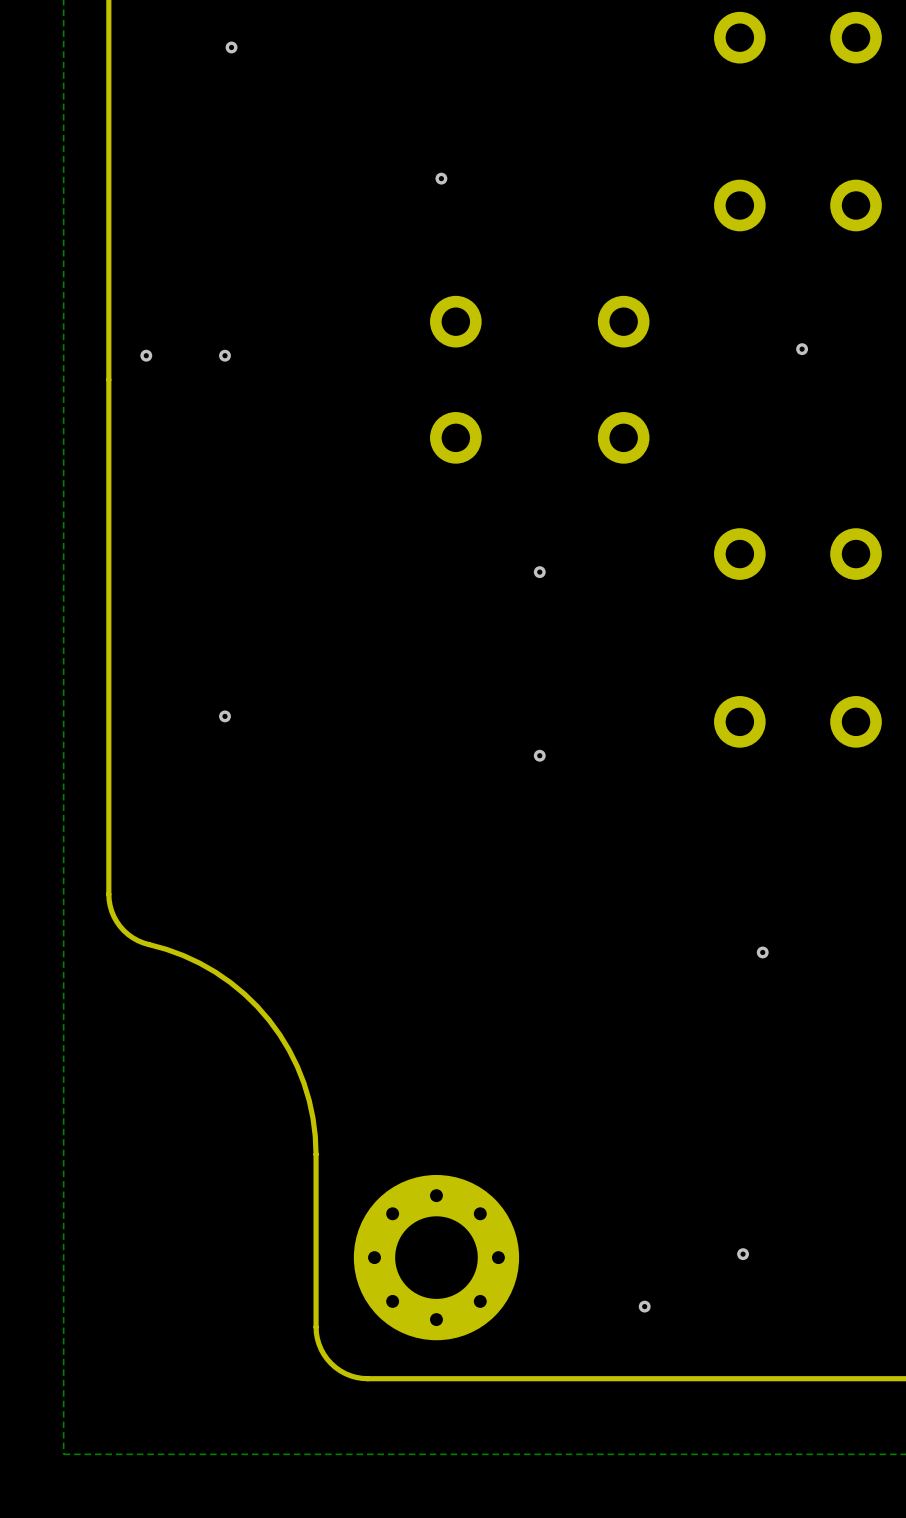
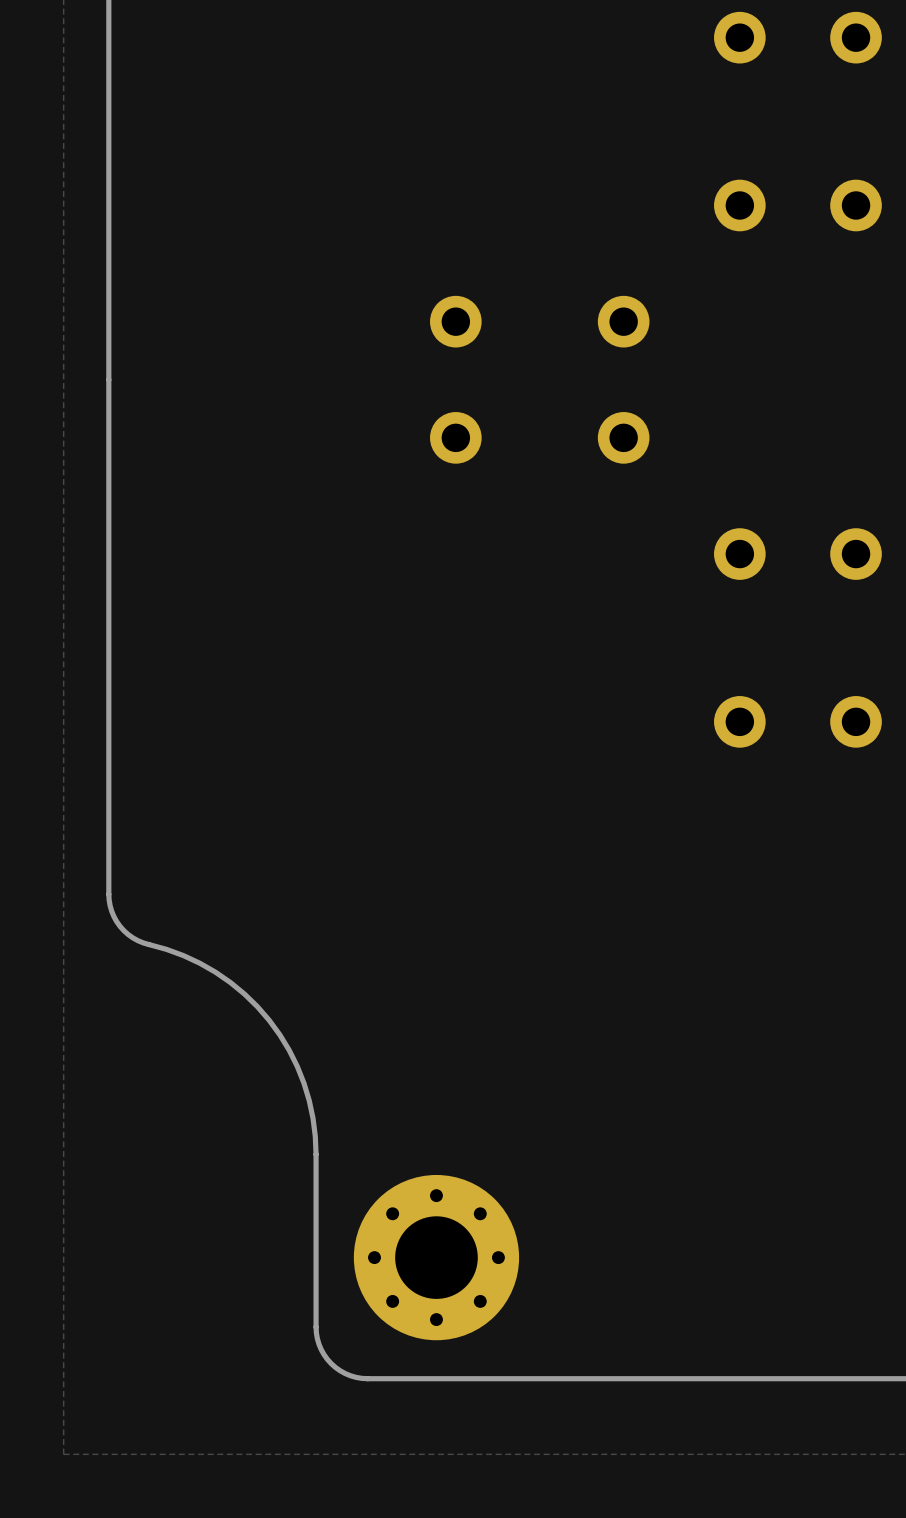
via: (231, 47) -> none
via: (441, 178) -> none
via: (802, 349) -> none
via: (146, 355) -> none
via: (224, 355) -> none
via: (539, 572) -> none
via: (224, 716) -> none
via: (539, 755) -> none
via: (762, 952) -> none
via: (743, 1254) -> none
via: (644, 1306) -> none

